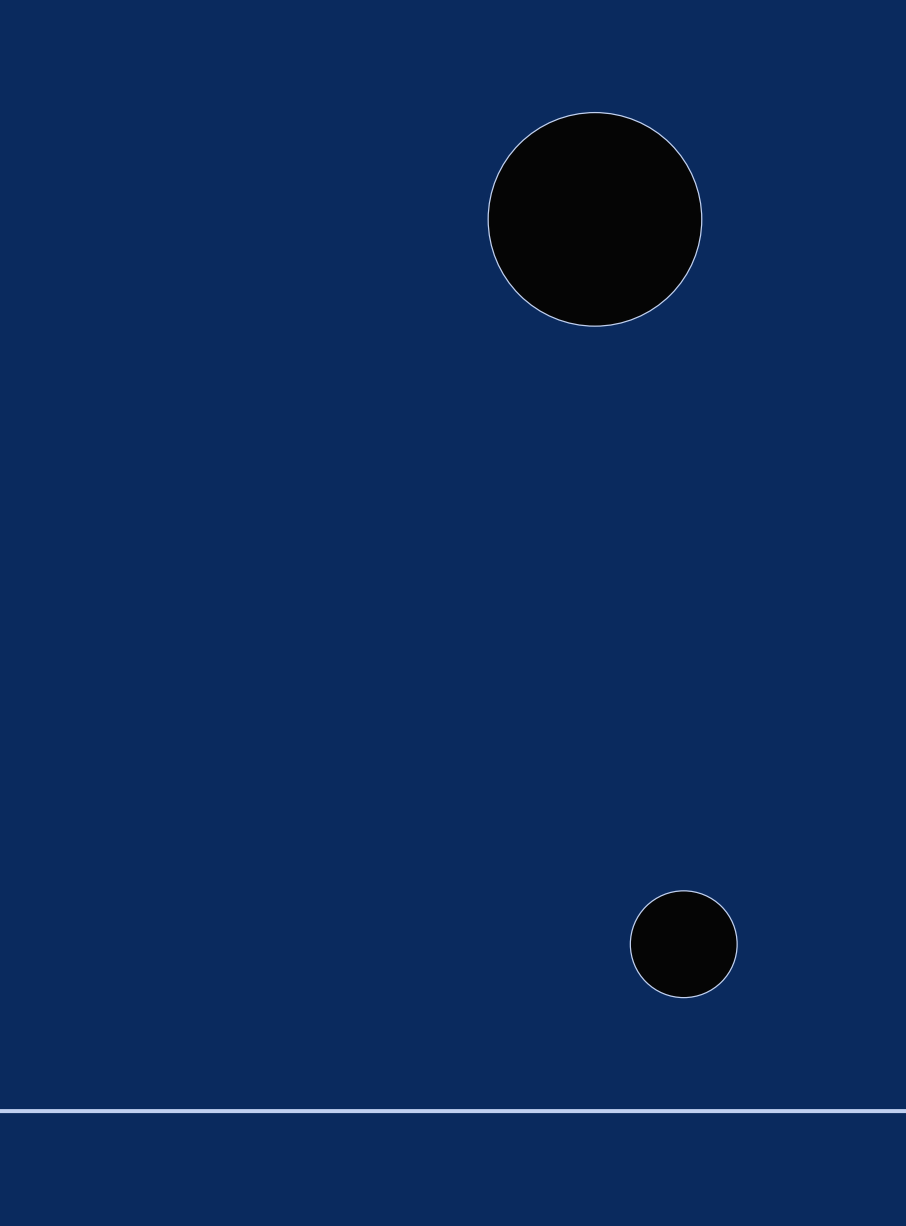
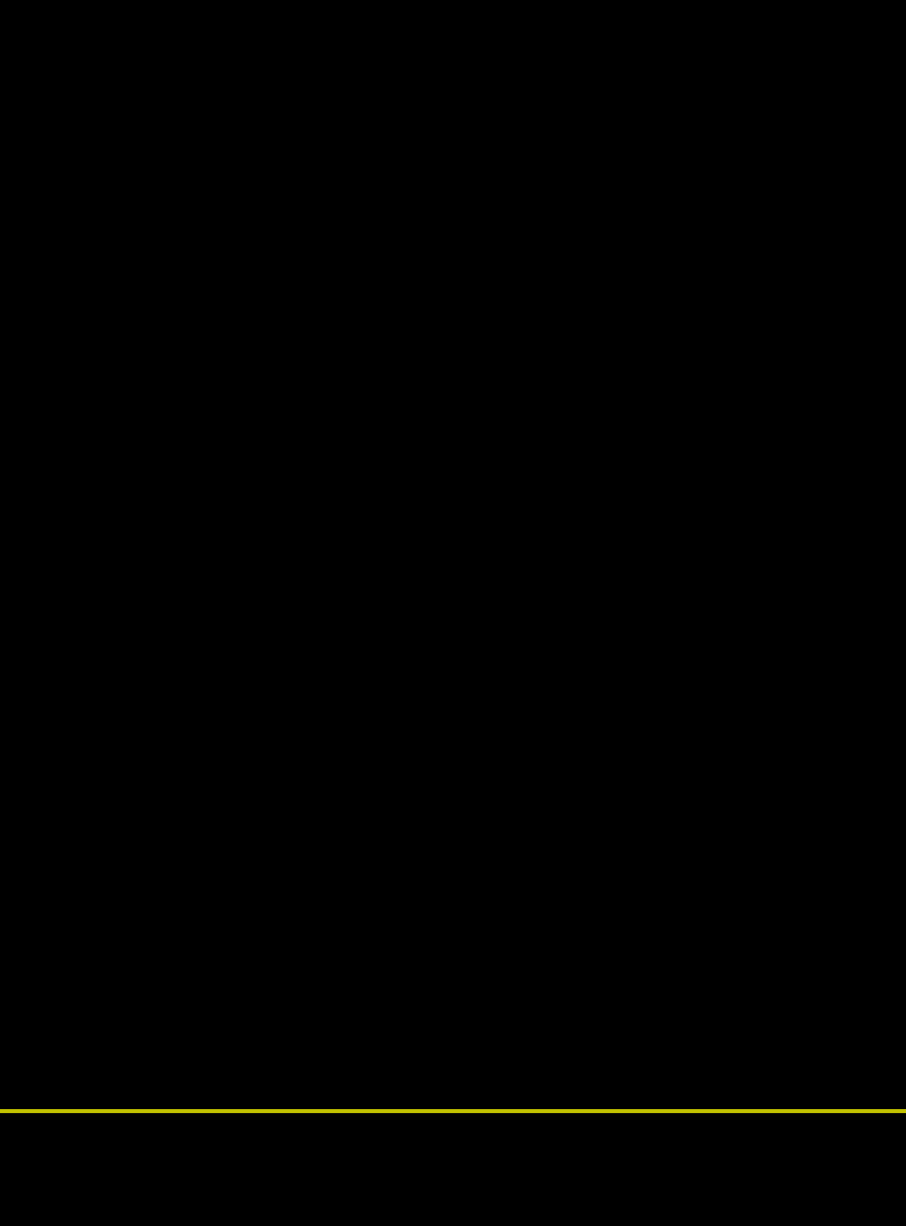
part: (594, 219) -> none
part: (683, 944) -> none

